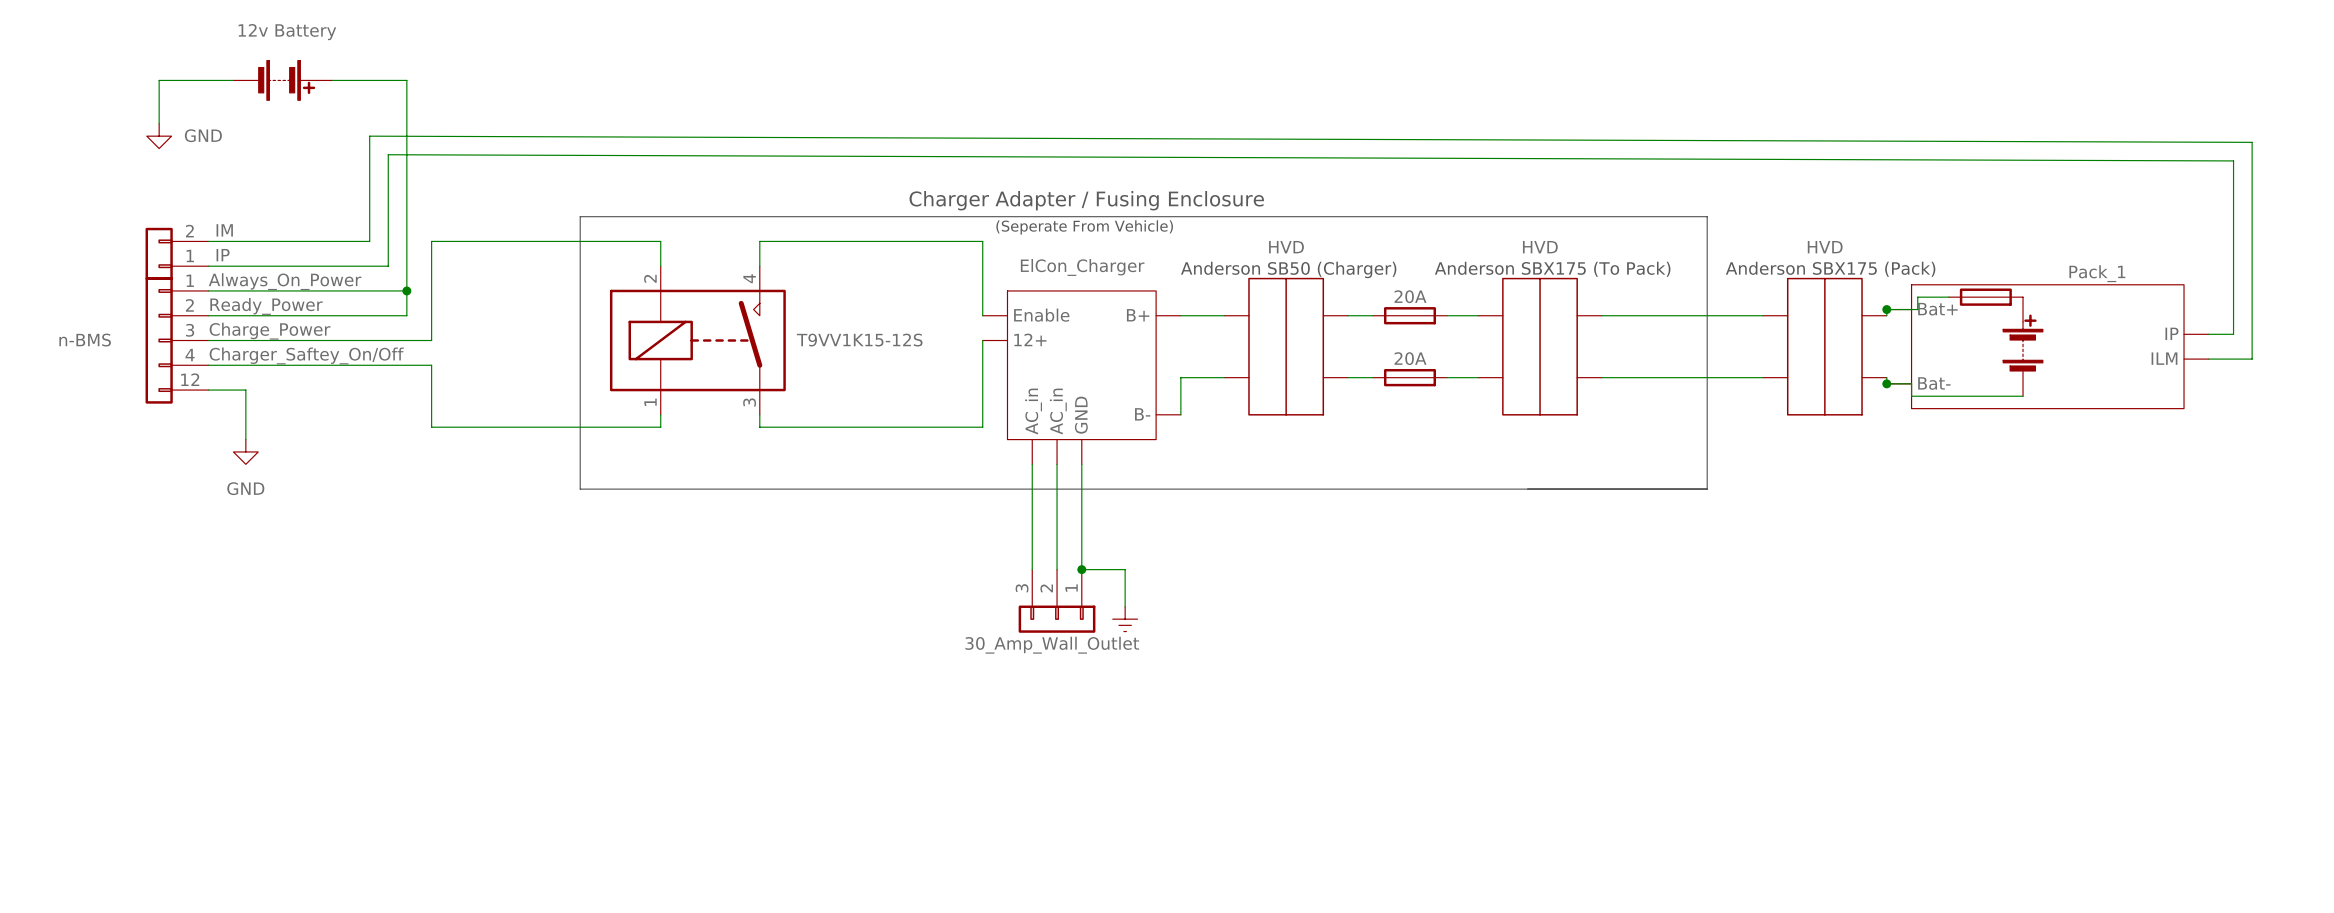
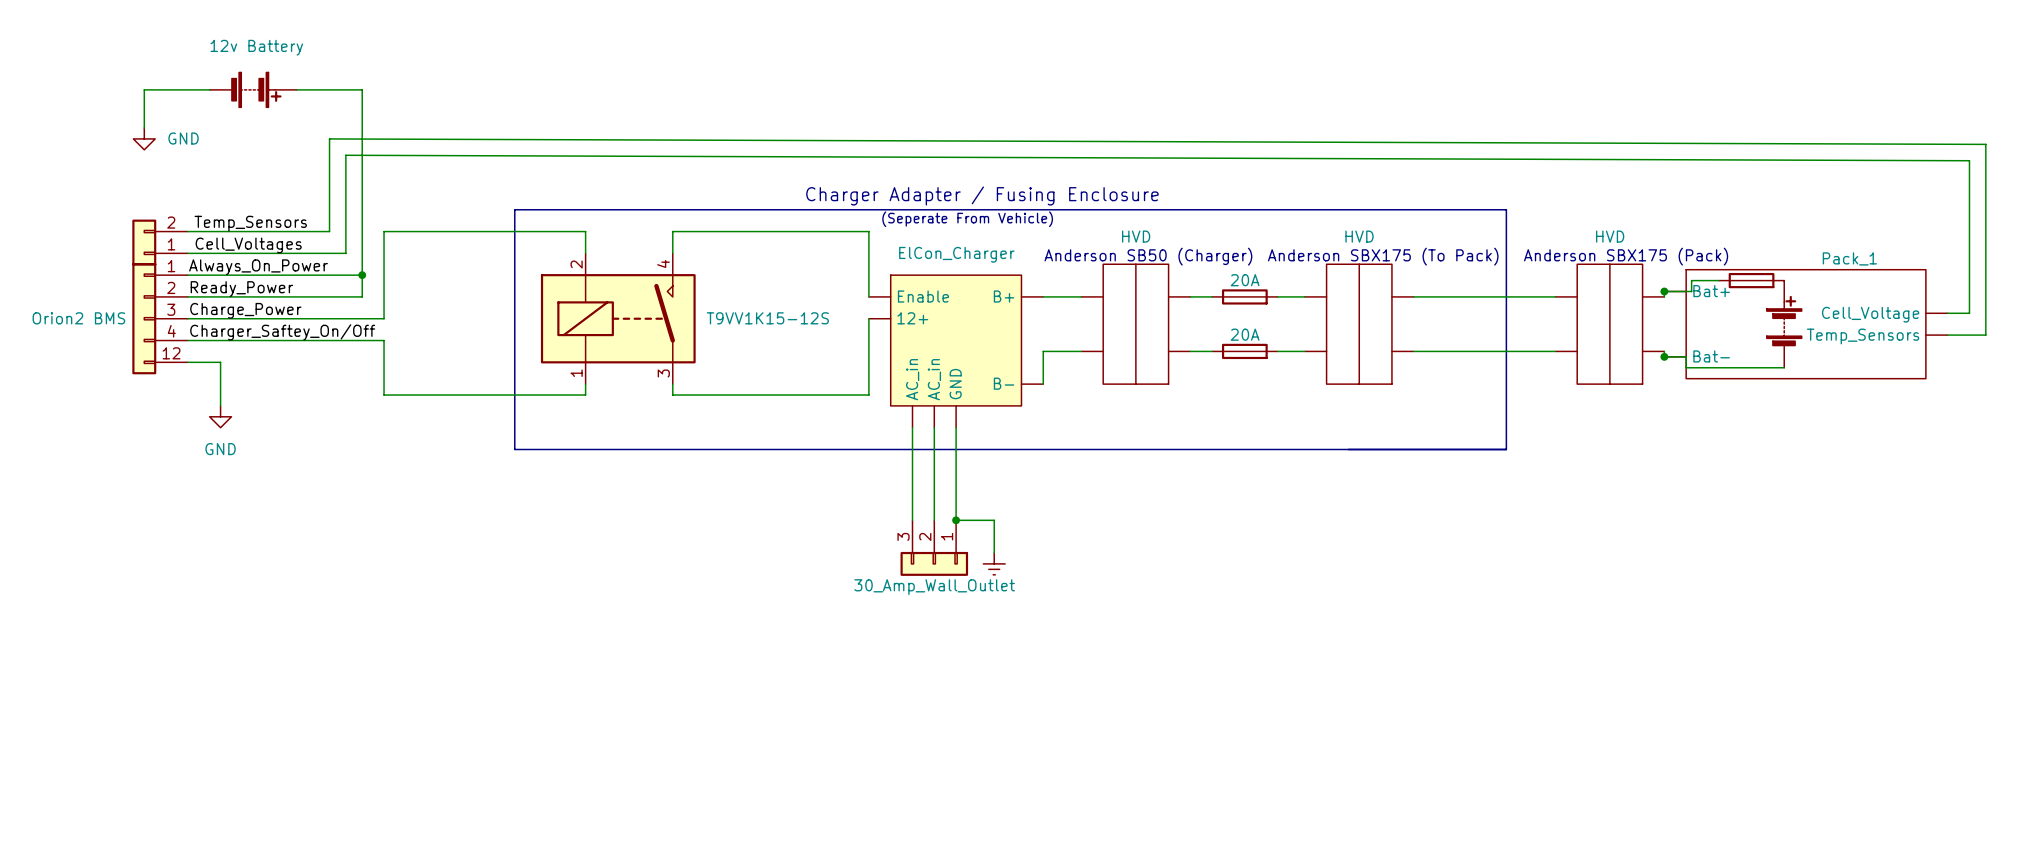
label: IM (224, 230) -> Temp_Sensors (250, 223)
label: IP (223, 255) -> Cell_Voltages (248, 245)
part pin name: IP (2171, 333) -> Cell_Voltage (1870, 314)
part value: n-BMS (85, 340) -> Orion2 BMS (78, 318)
part pin name: ILM (2164, 358) -> Temp_Sensors (1863, 336)

